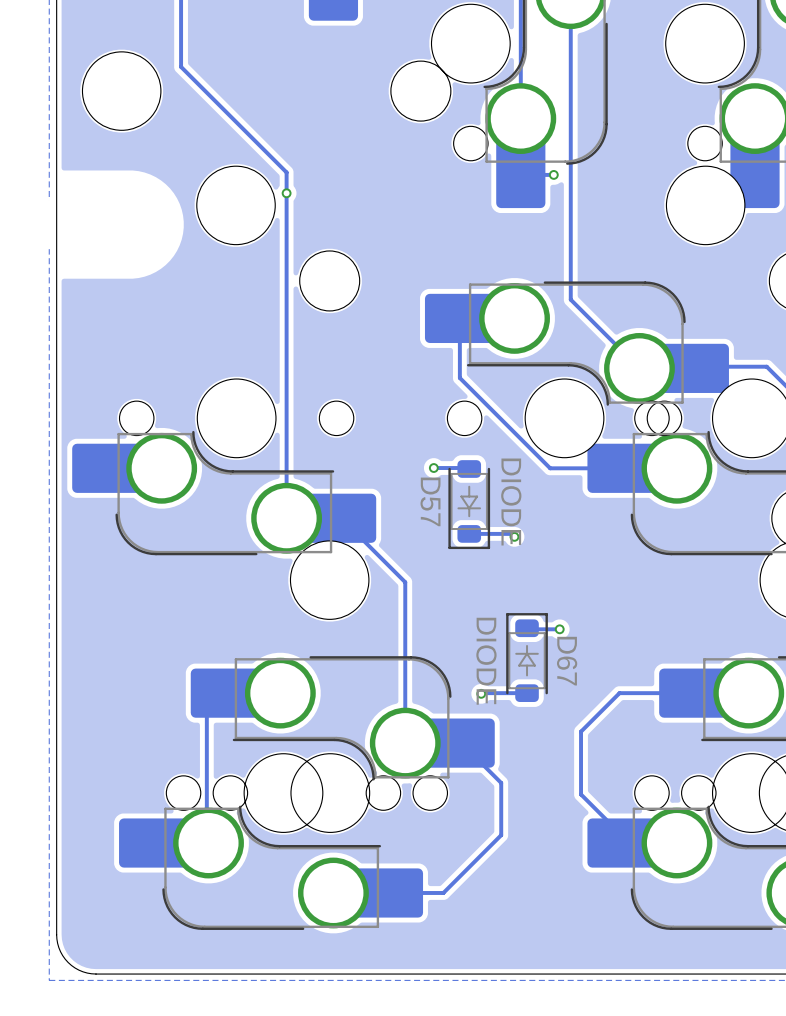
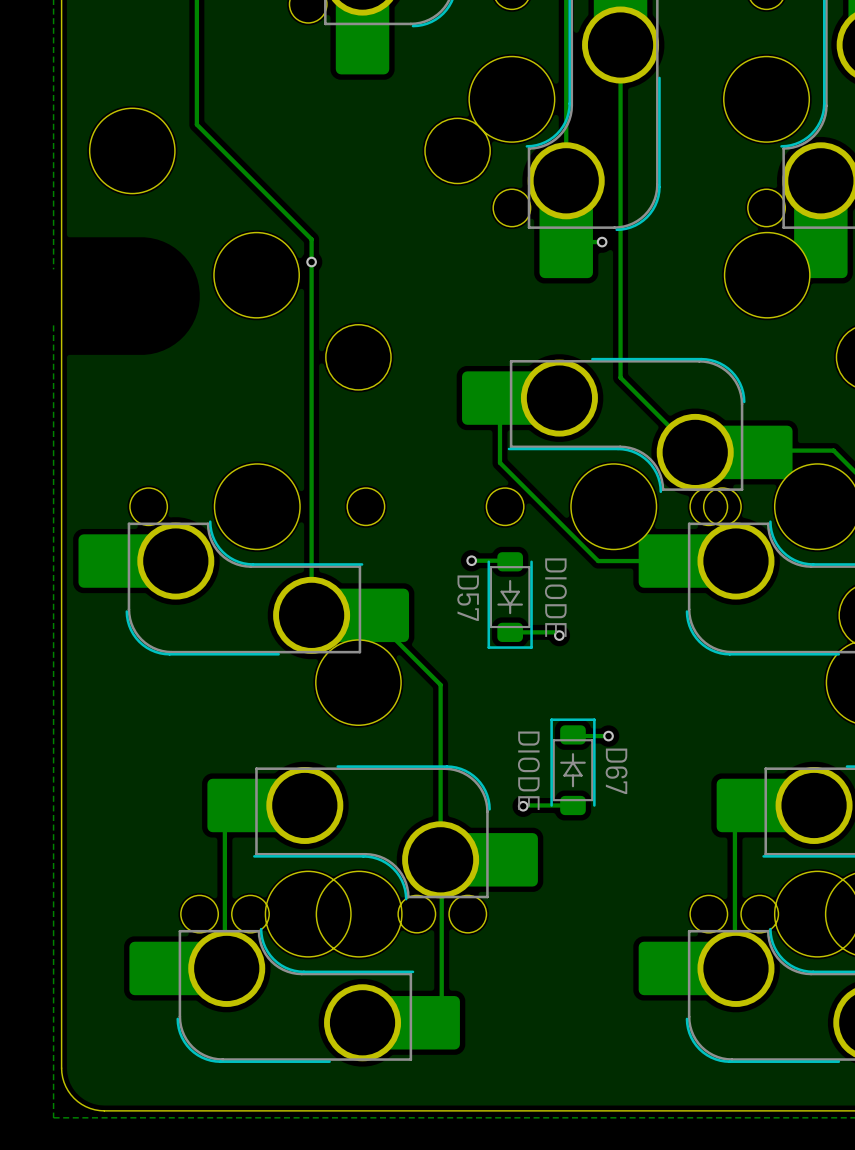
track: (748, 693) (619, 693) (581, 731) (581, 794) (629, 843) (676, 843) -> none
track: none -> (734, 825) (734, 967)
track: (405, 743) (461, 743) (501, 782) (501, 835) (443, 892) (333, 892) -> none
track: none -> (441, 860) (441, 1003)

